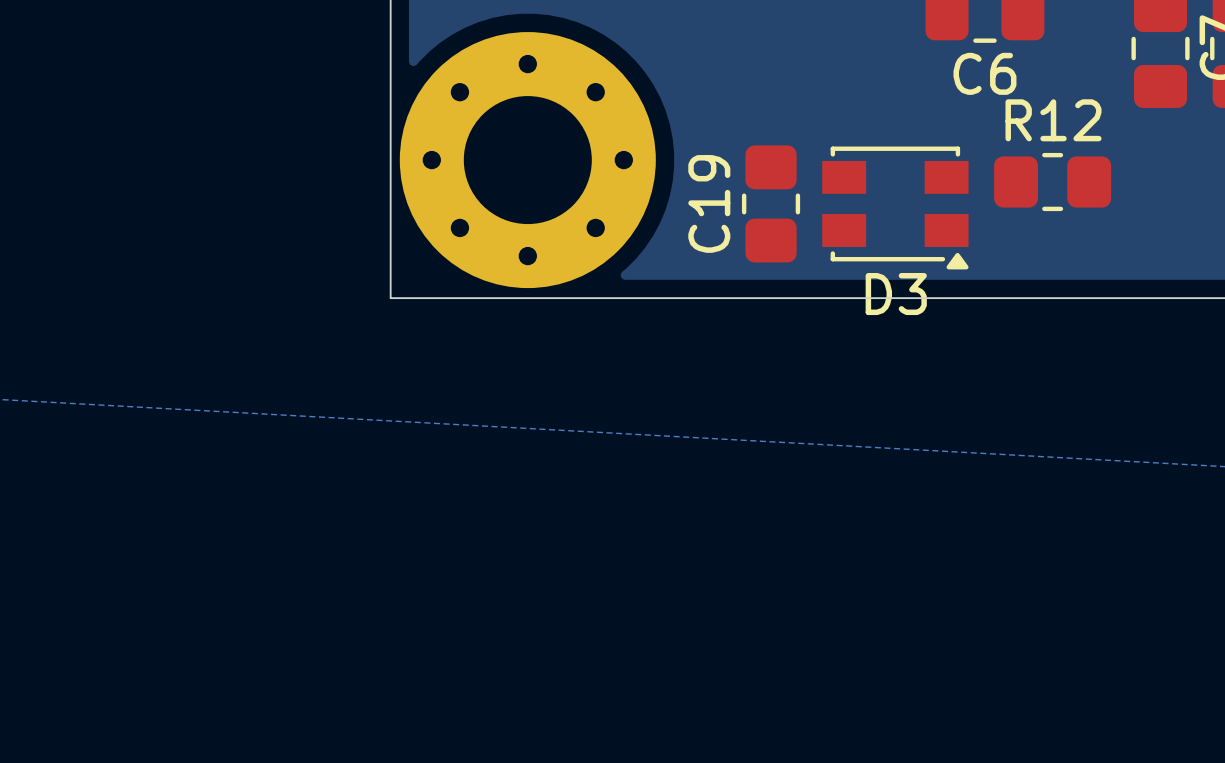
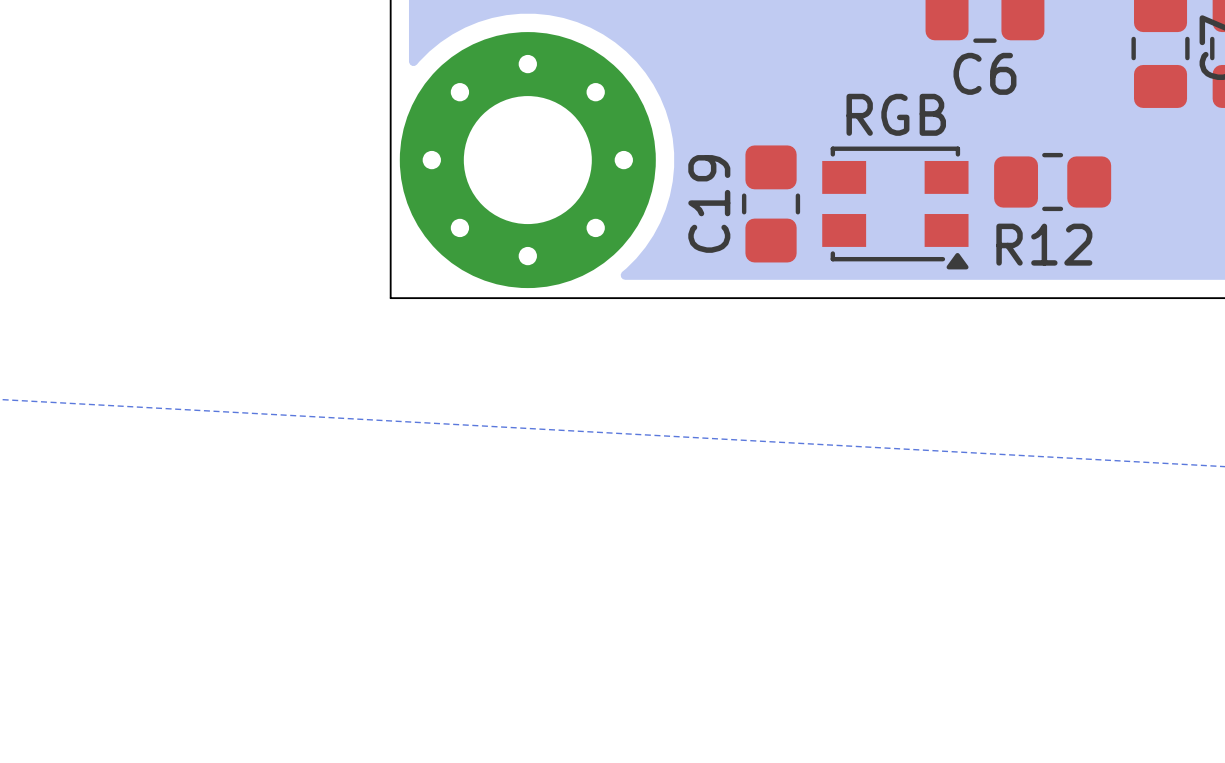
R12 name position: R12 (1053, 120) -> R12 (1044, 244)
D3 name: D3 (896, 294) -> RGB (896, 114)

